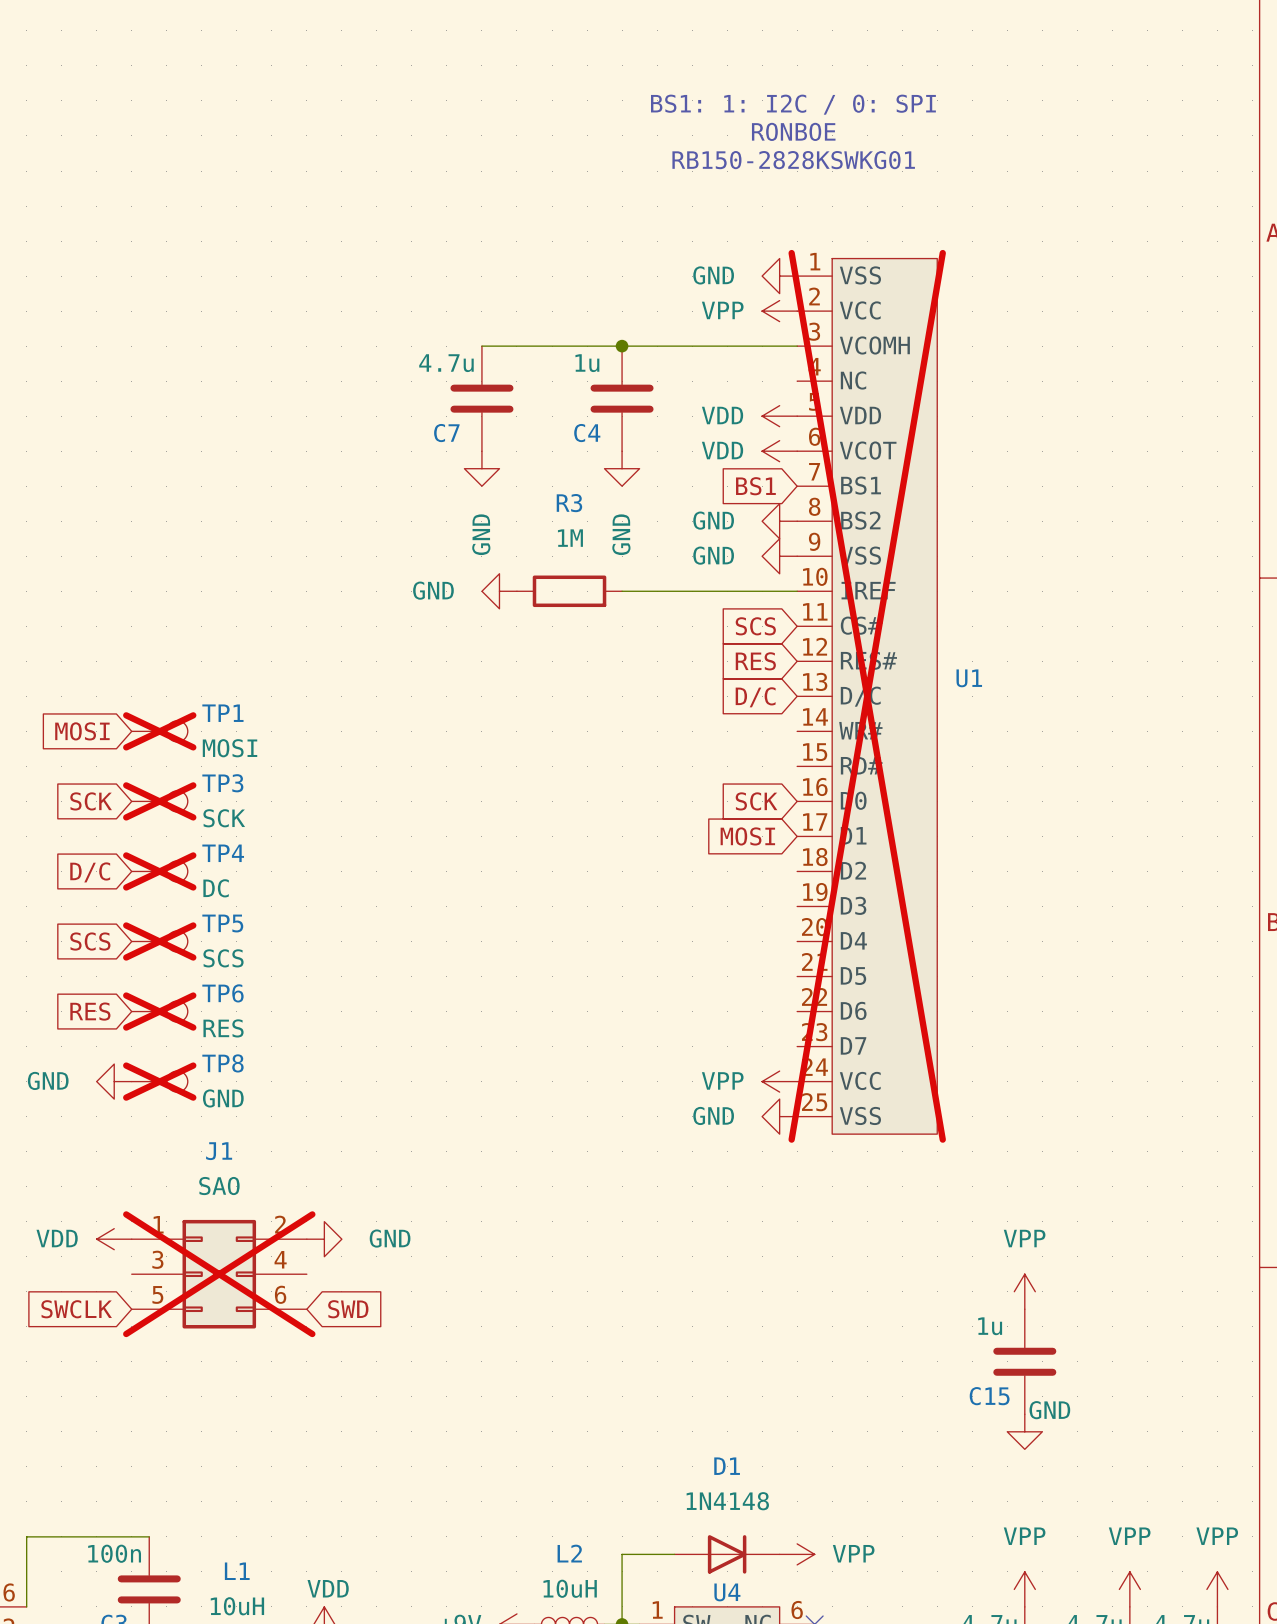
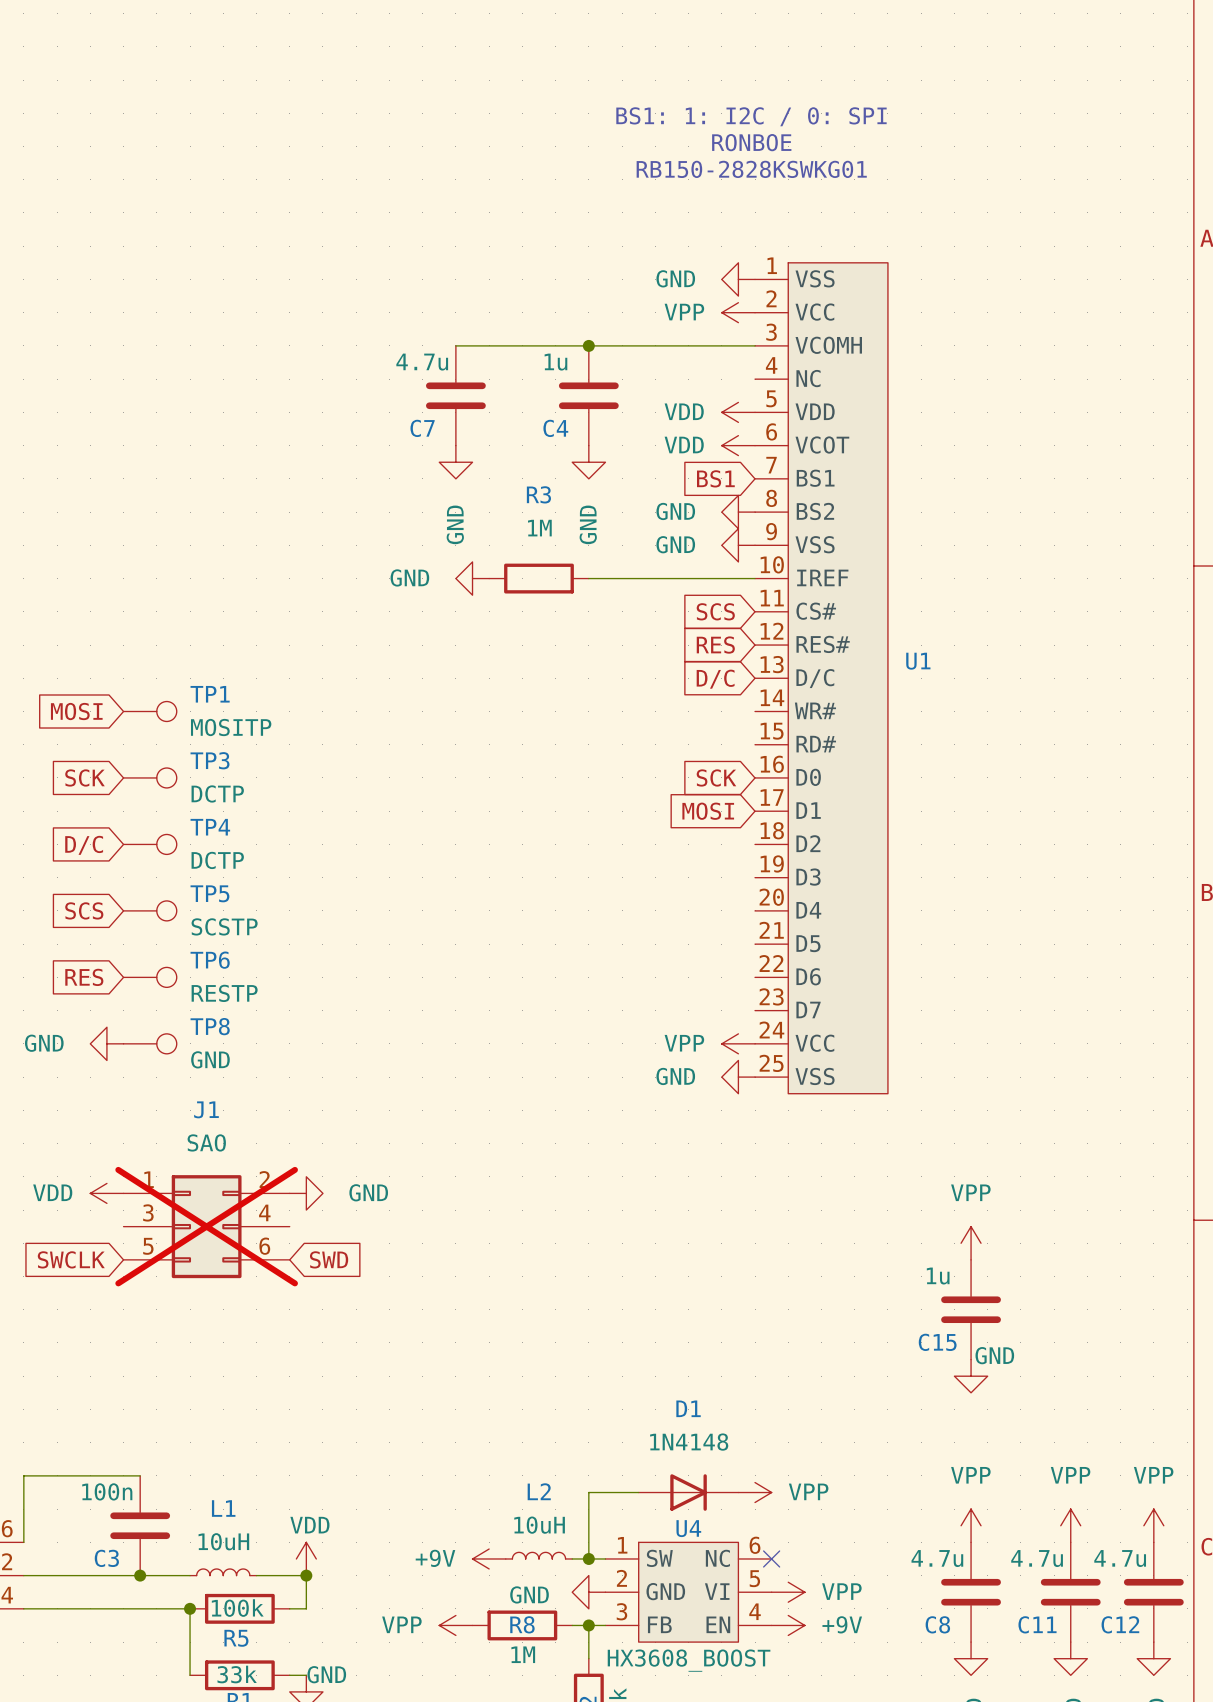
U1 do-not-place cross: (867, 696) -> none
TP1 do-not-place cross: (159, 731) -> none
TP1 value: MOSI (230, 748) -> MOSITP (231, 727)
TP3 do-not-place cross: (159, 801) -> none
TP3 value: SCK (224, 818) -> DCTP (217, 793)
TP4 do-not-place cross: (159, 871) -> none
TP4 value: DC (216, 888) -> DCTP (217, 860)
TP5 do-not-place cross: (159, 941) -> none
TP5 value: SCS (223, 958) -> SCSTP (224, 926)
TP6 do-not-place cross: (159, 1011) -> none
TP6 value: RES (223, 1028) -> RESTP (224, 993)
TP8 do-not-place cross: (159, 1081) -> none

